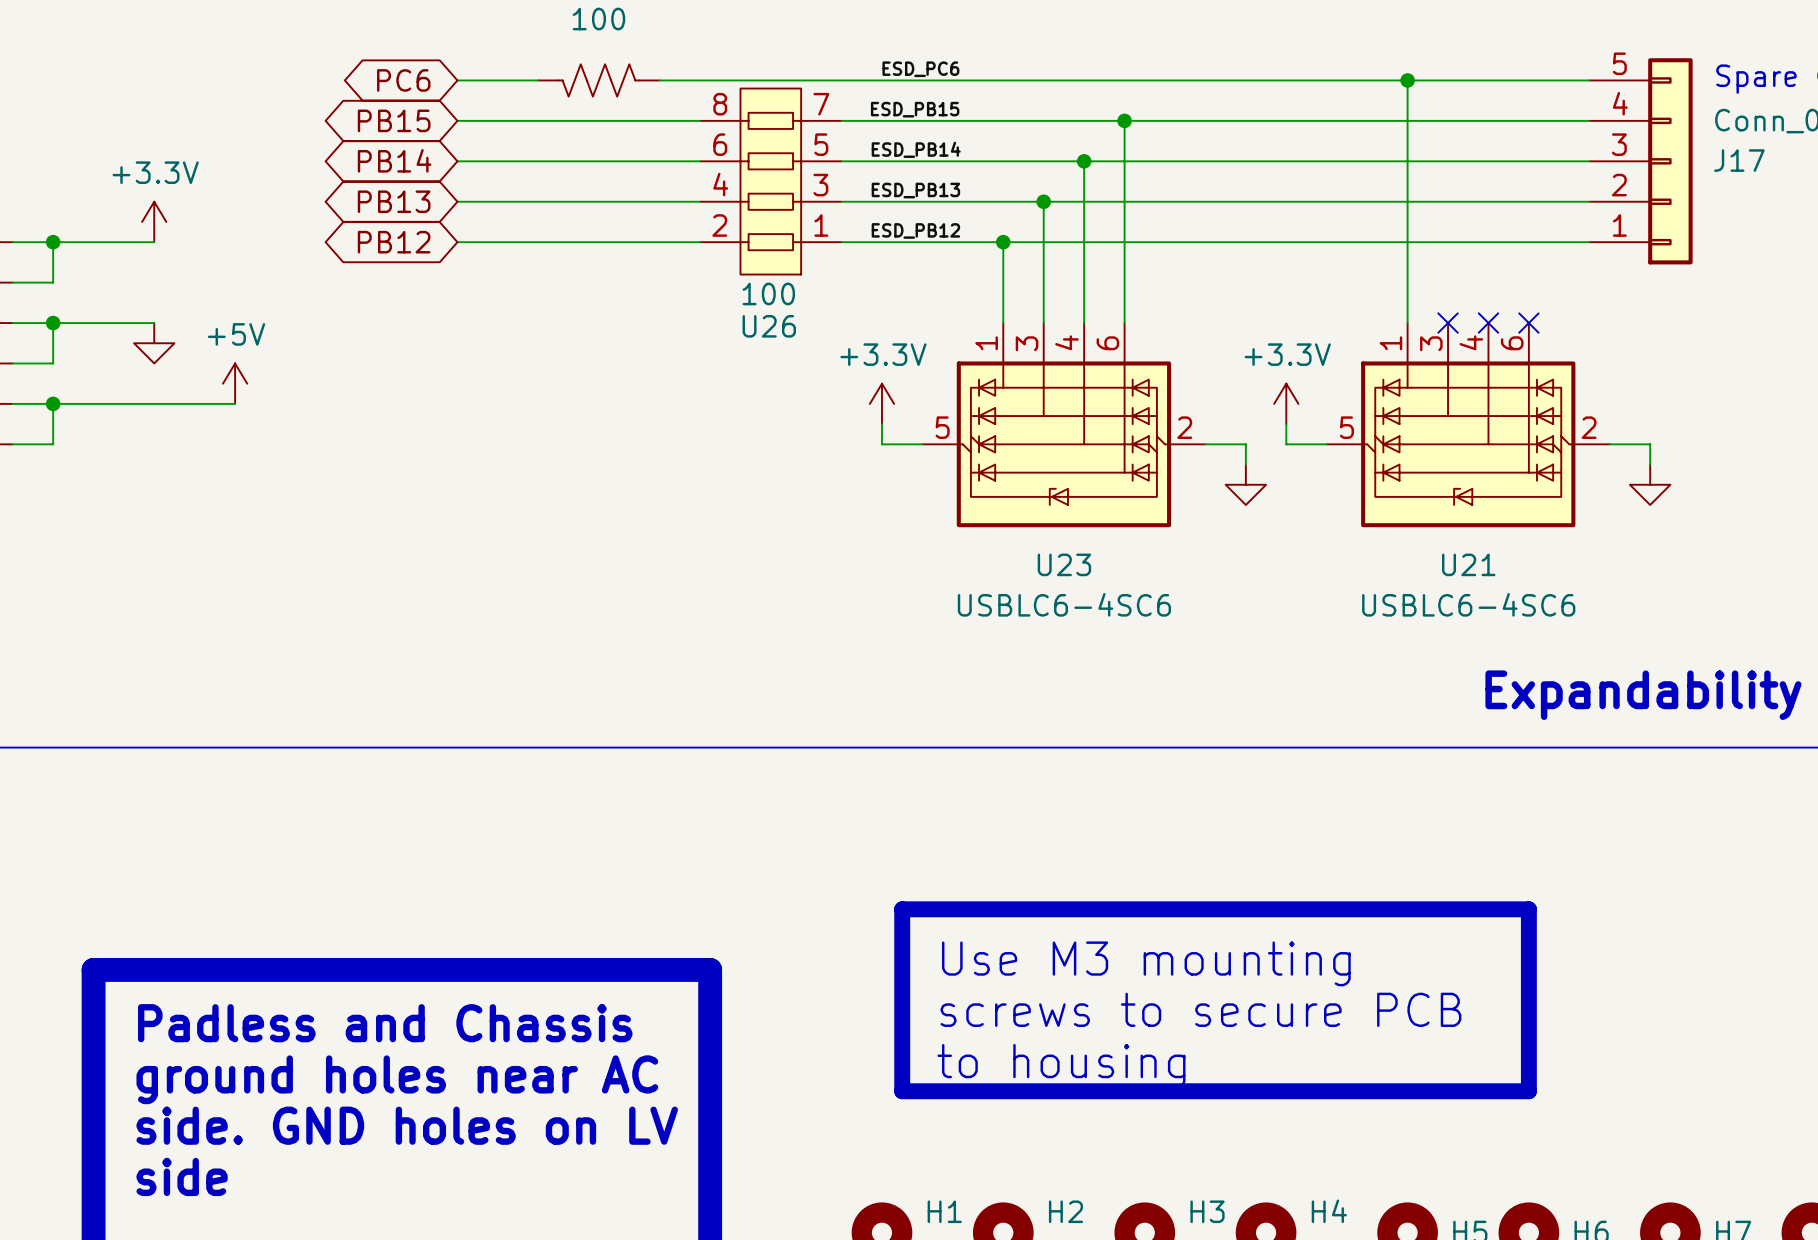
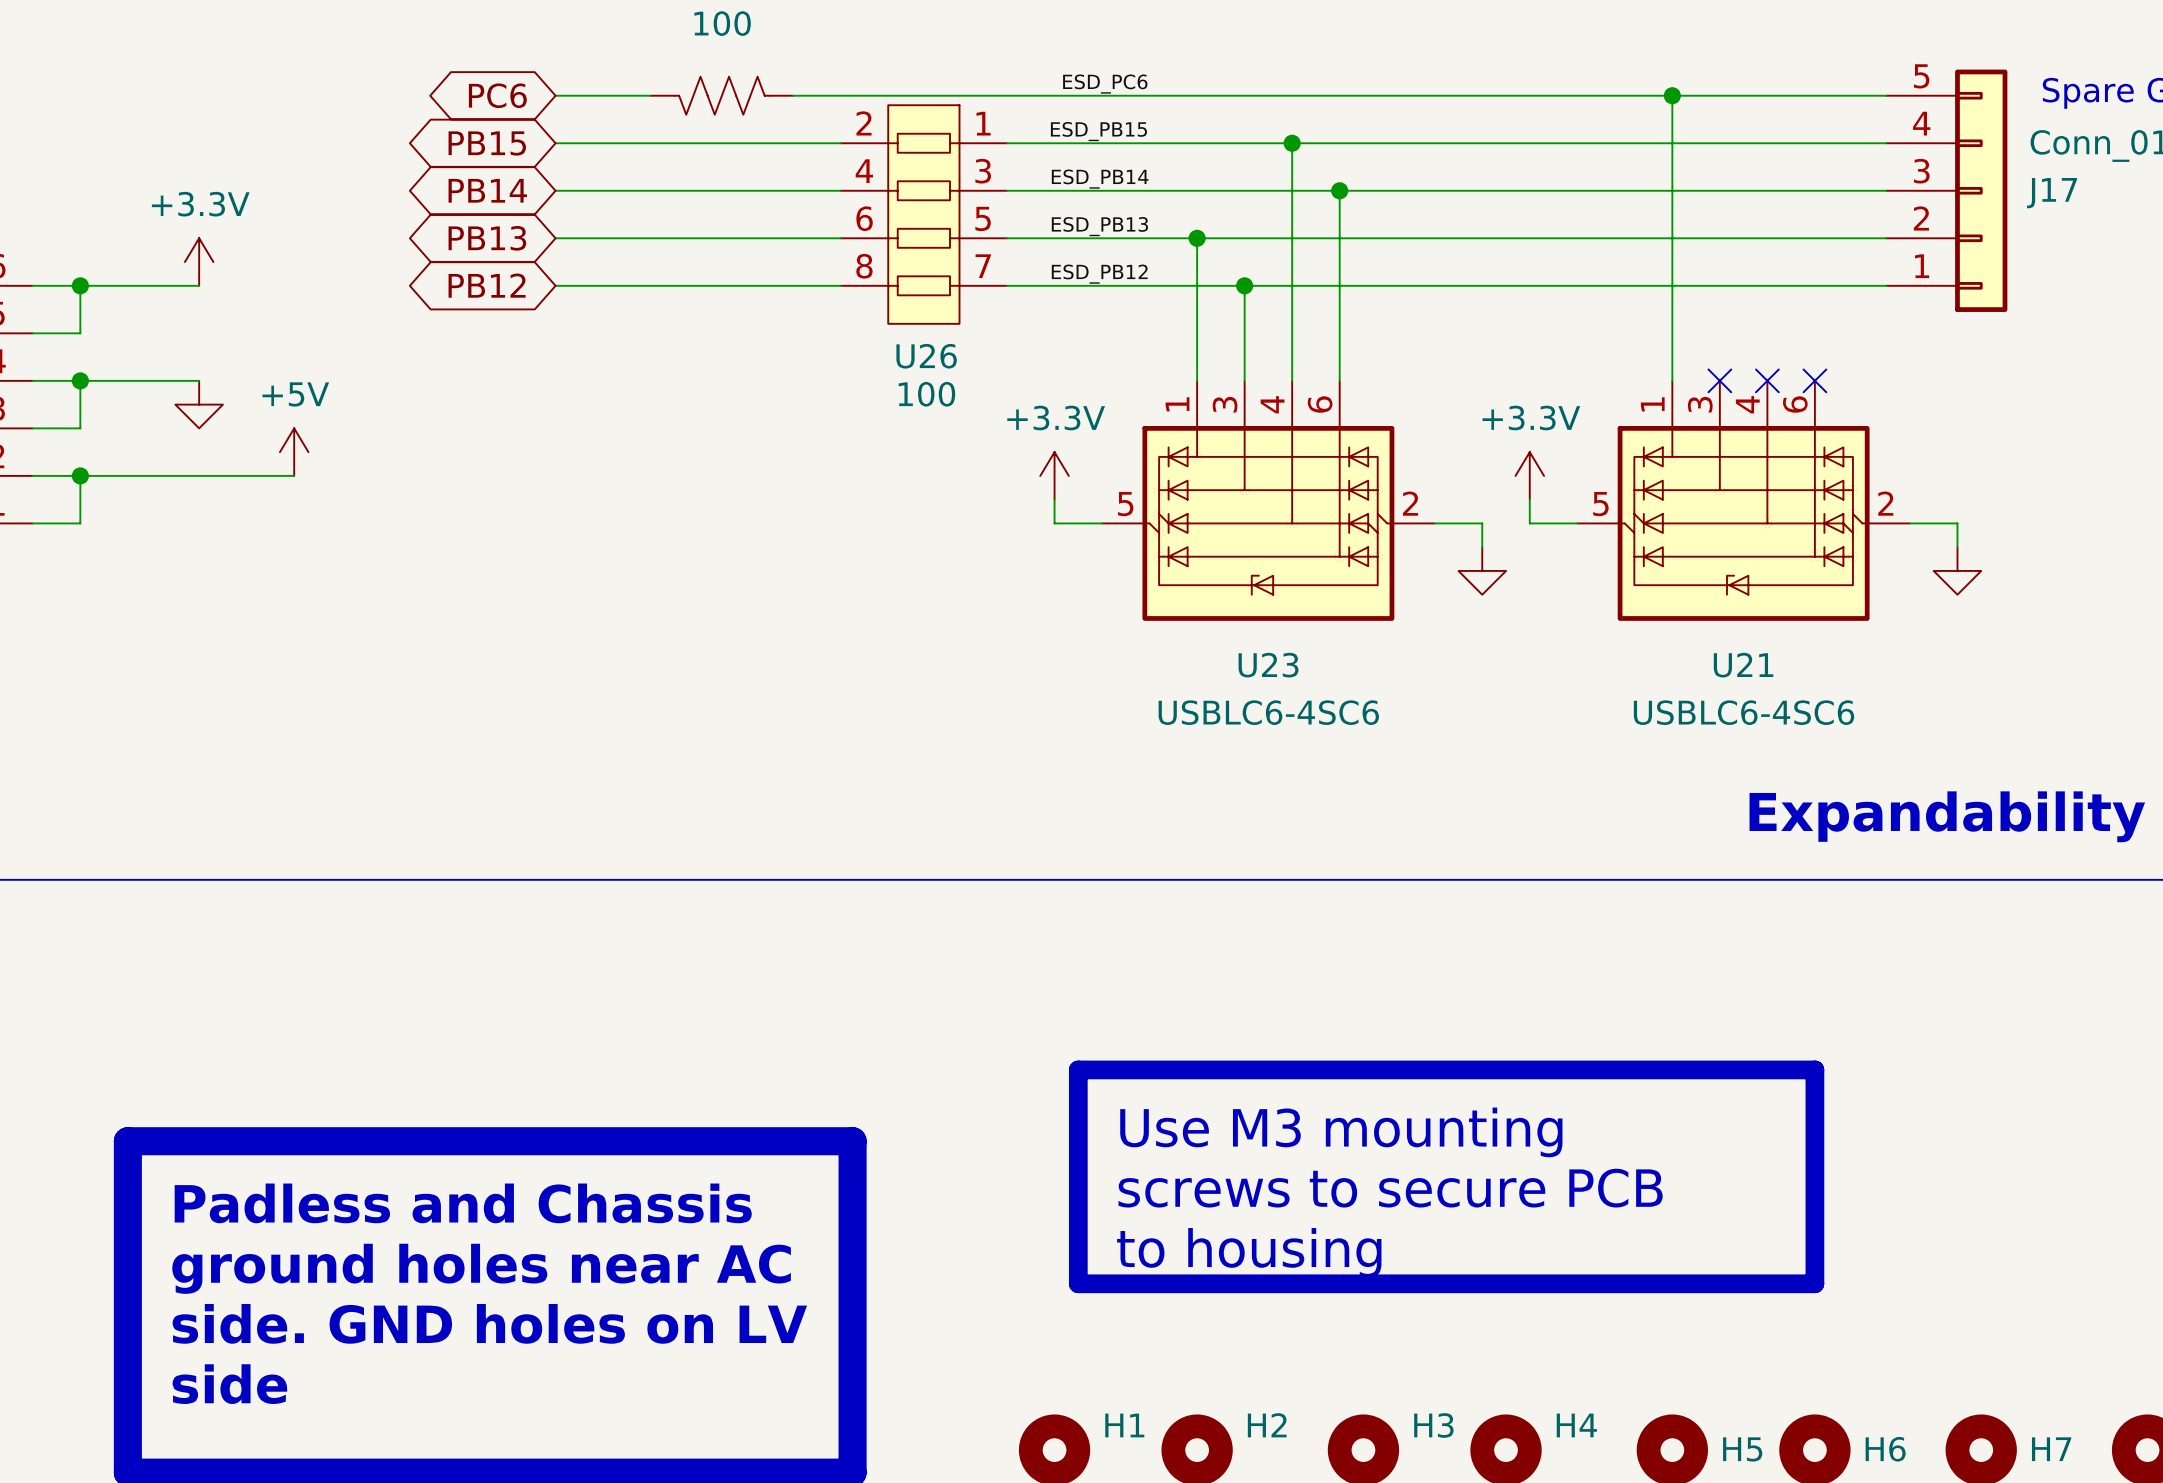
junction: none -> (1292, 143)
wire: (1124, 120) (1124, 161) -> (1292, 143) (1292, 190)
junction: (1124, 120) -> none
junction: (1084, 161) -> none
junction: none -> (1339, 190)
U26 flip: as is (770, 181) -> up-down (923, 214)
junction: none -> (1197, 238)
wire: (1043, 201) (1043, 242) -> (1197, 238) (1197, 285)
junction: (1043, 201) -> none
junction: (1003, 242) -> none
junction: none -> (1244, 285)
U26 value position: 100 (768, 293) -> 100 (926, 394)

